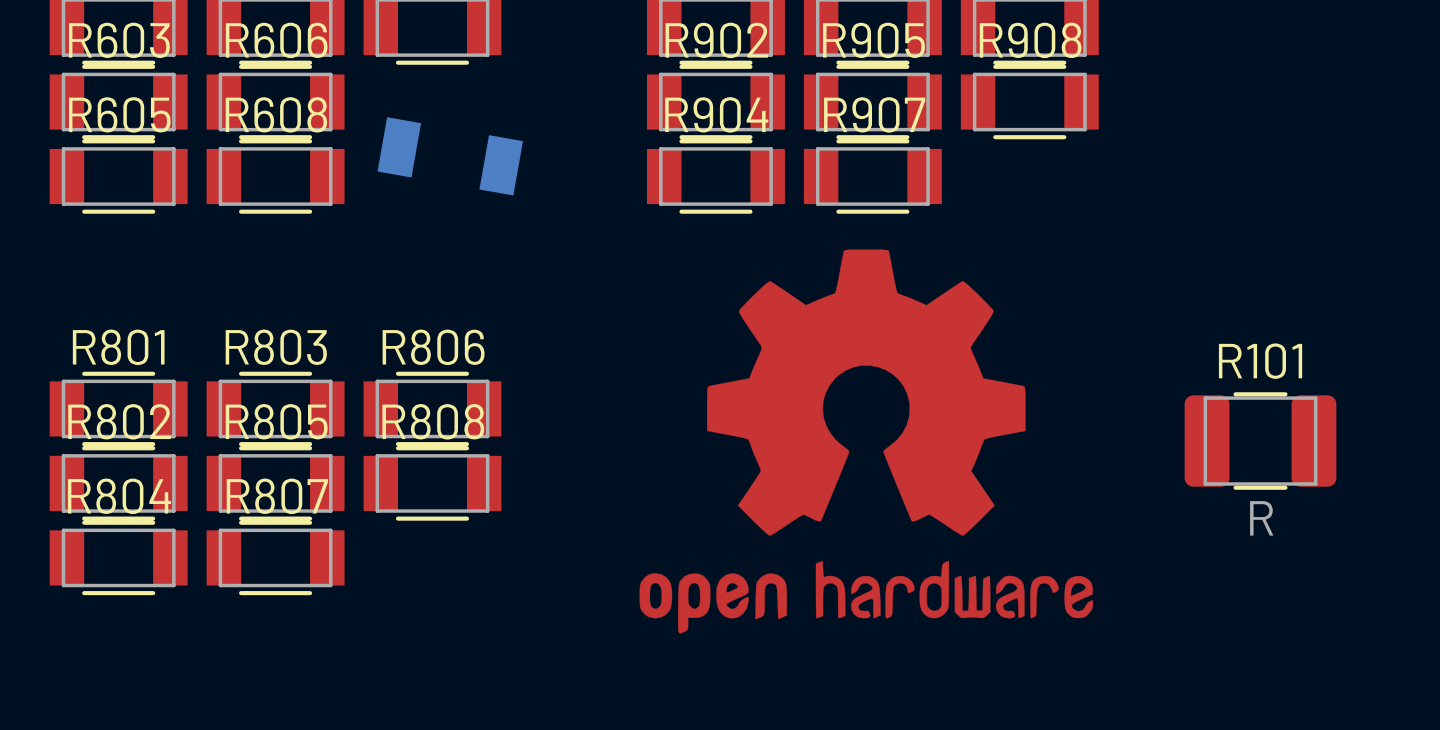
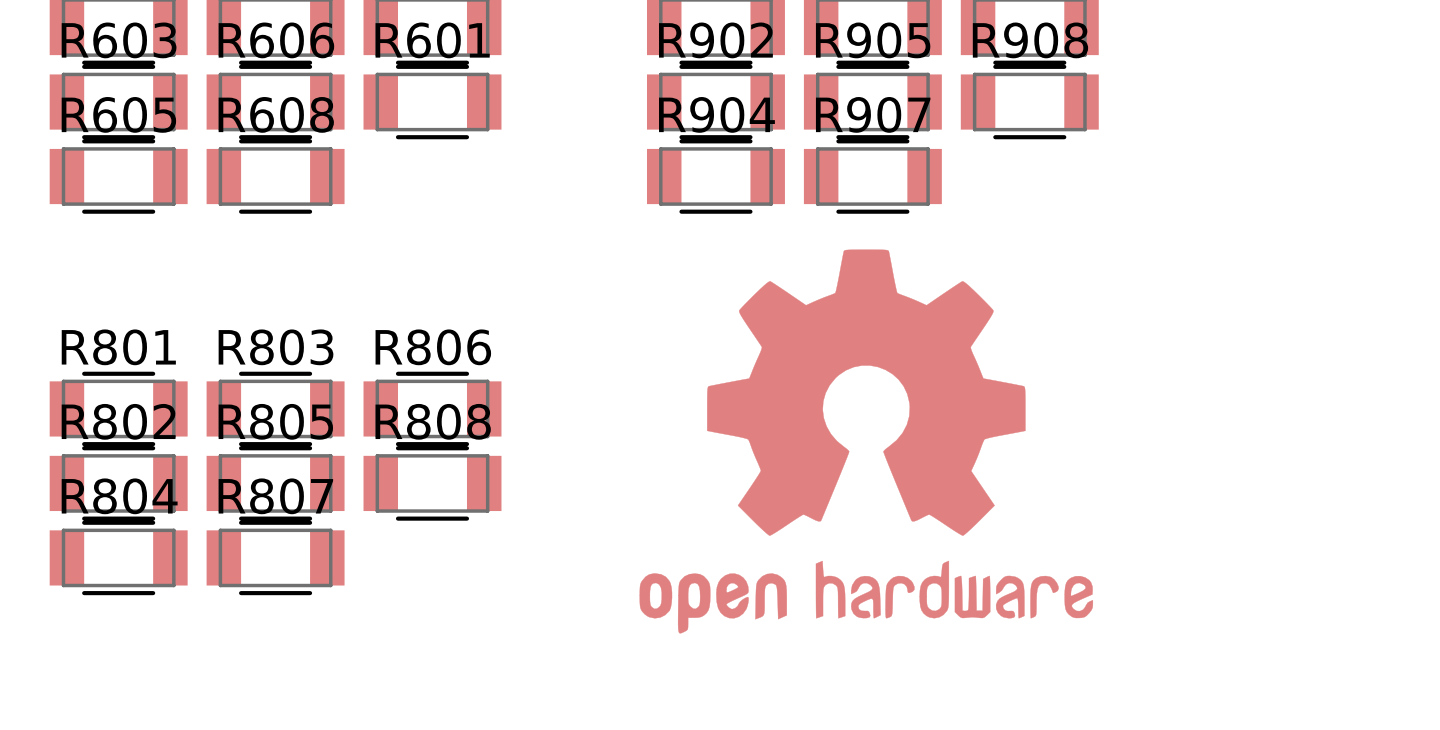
R601 side: bottom (450, 156) -> top (432, 102)
R101: R (1260, 441) -> none

